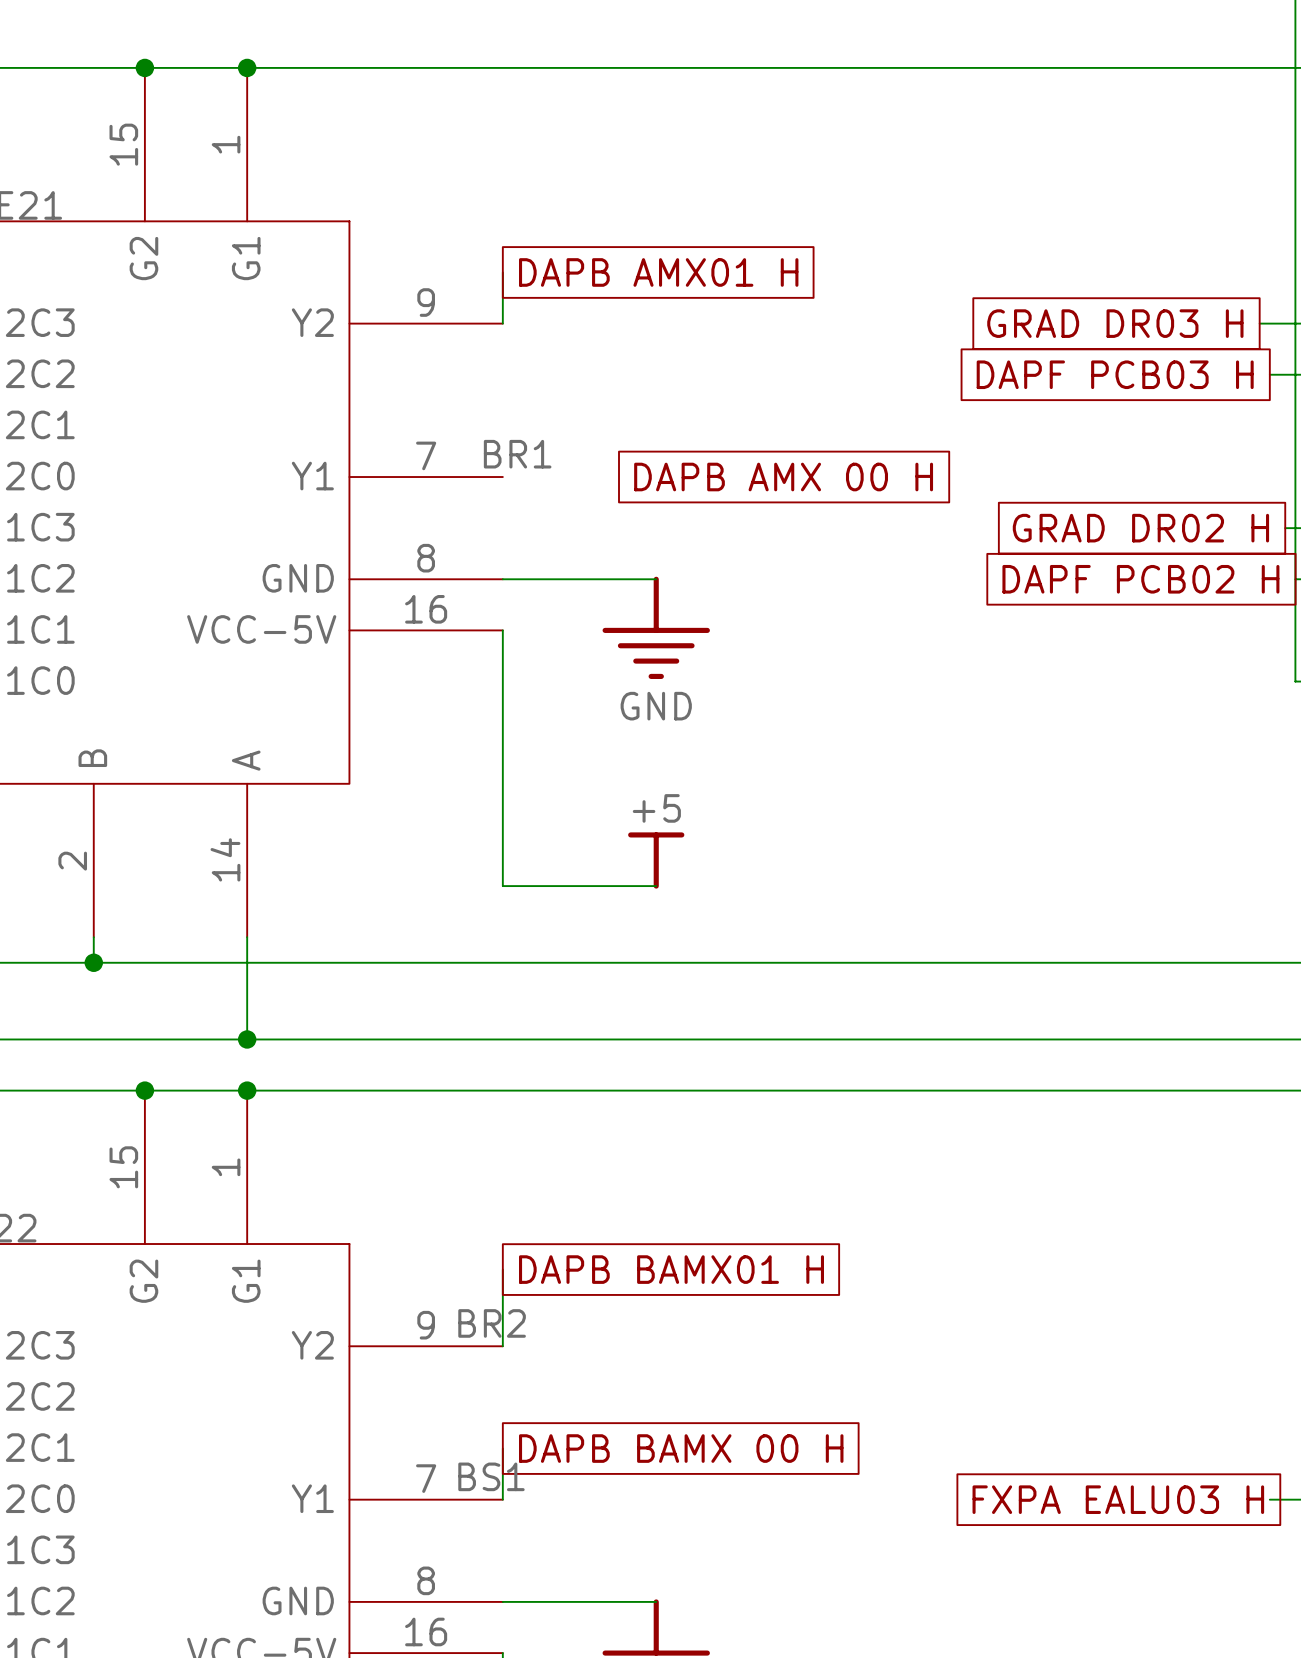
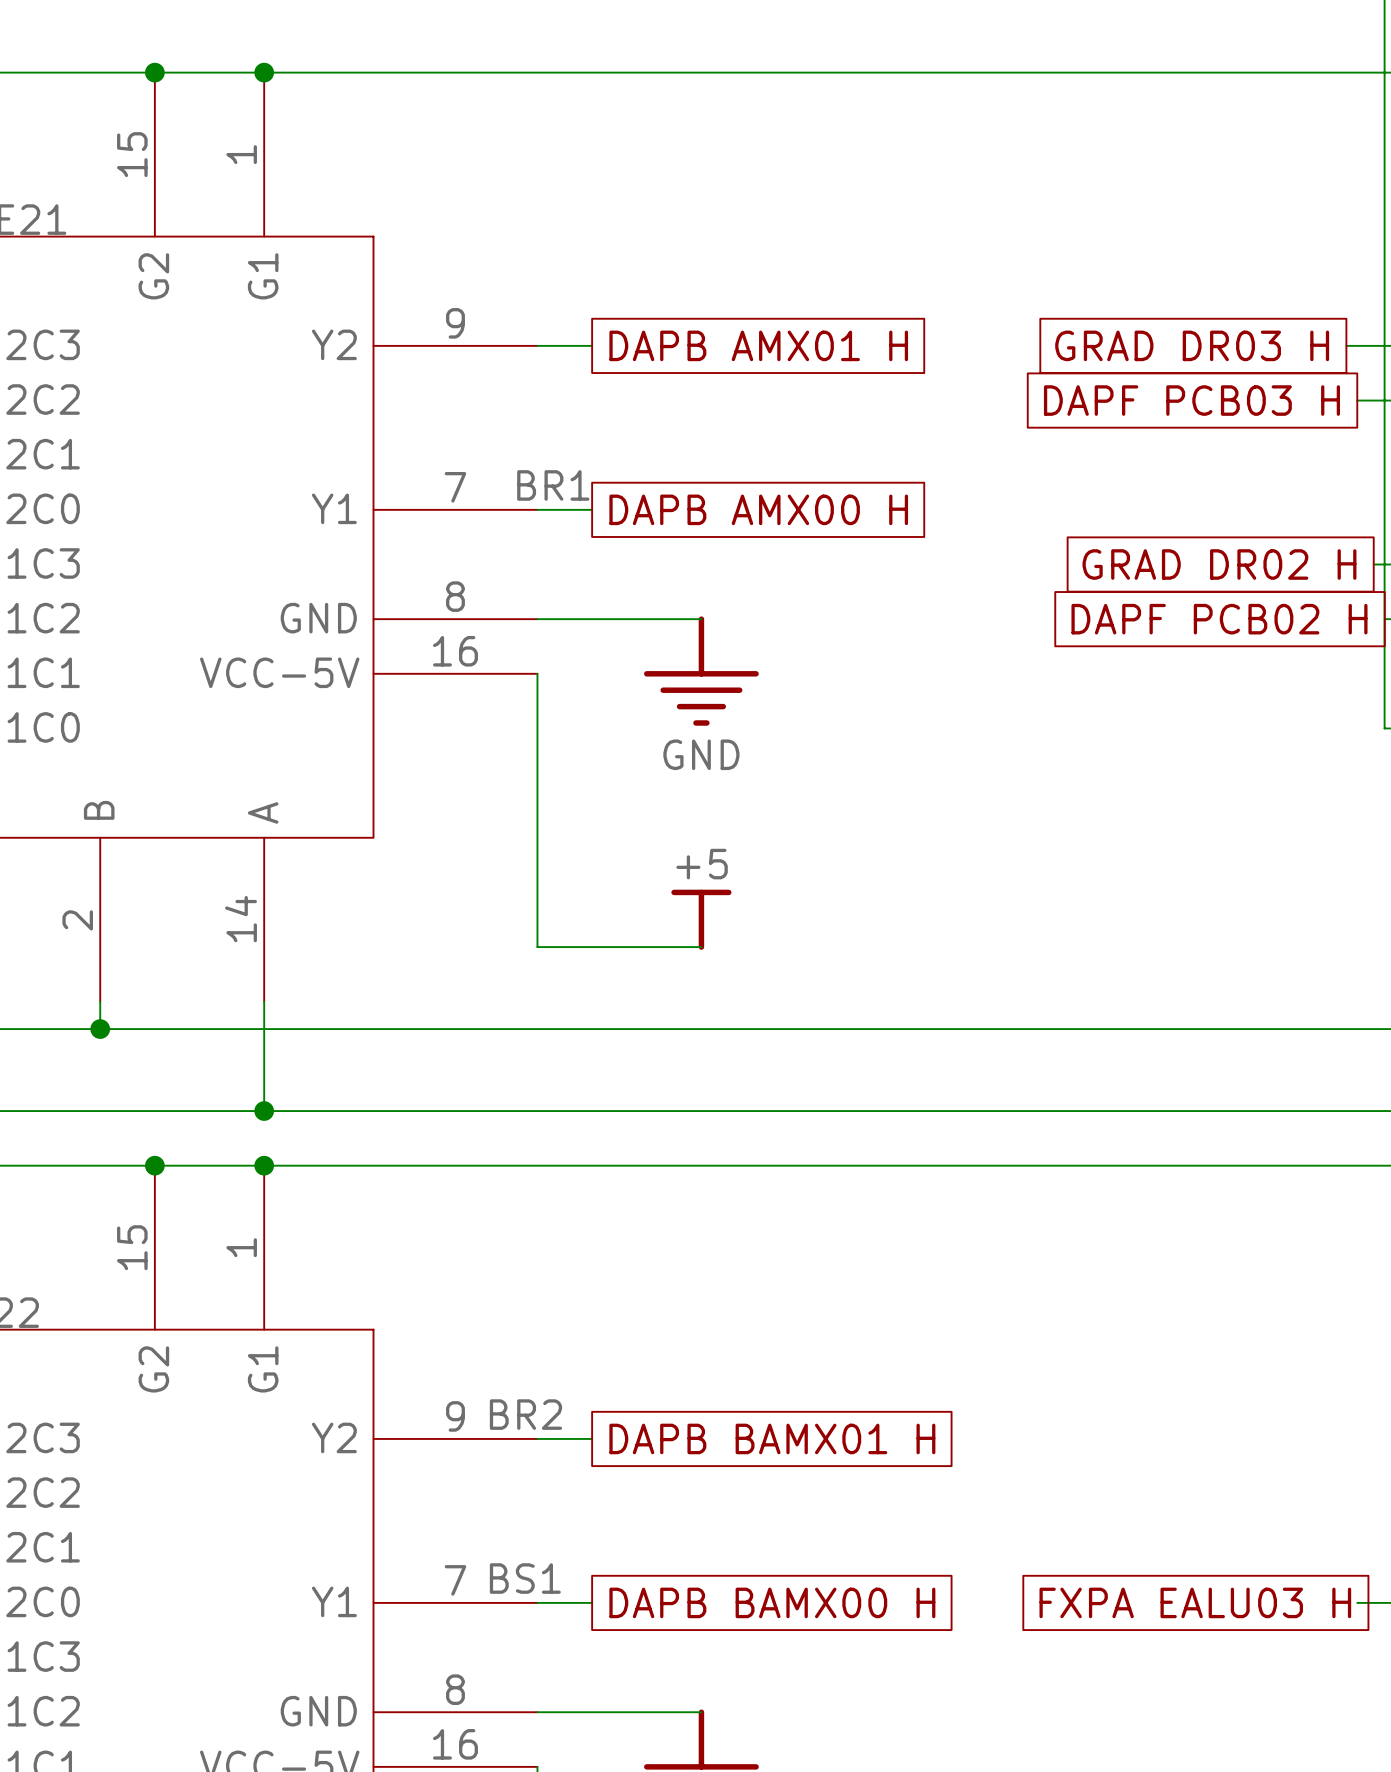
wire: (502, 272) (502, 323) -> (592, 345) (537, 345)
global label position: DAPB AMX01 H (658, 272) -> DAPB AMX01 H (758, 345)
wire: none -> (537, 509) (592, 509)
global label: DAPB AMX 00 H (783, 477) -> DAPB AMX00 H (758, 509)
wire: (502, 1269) (502, 1346) -> (592, 1438) (537, 1438)
global label position: DAPB BAMX01 H (671, 1269) -> DAPB BAMX01 H (772, 1438)
wire: (502, 1448) (502, 1499) -> (592, 1602) (537, 1602)
global label: DAPB BAMX 00 H (681, 1448) -> DAPB BAMX00 H (772, 1602)

